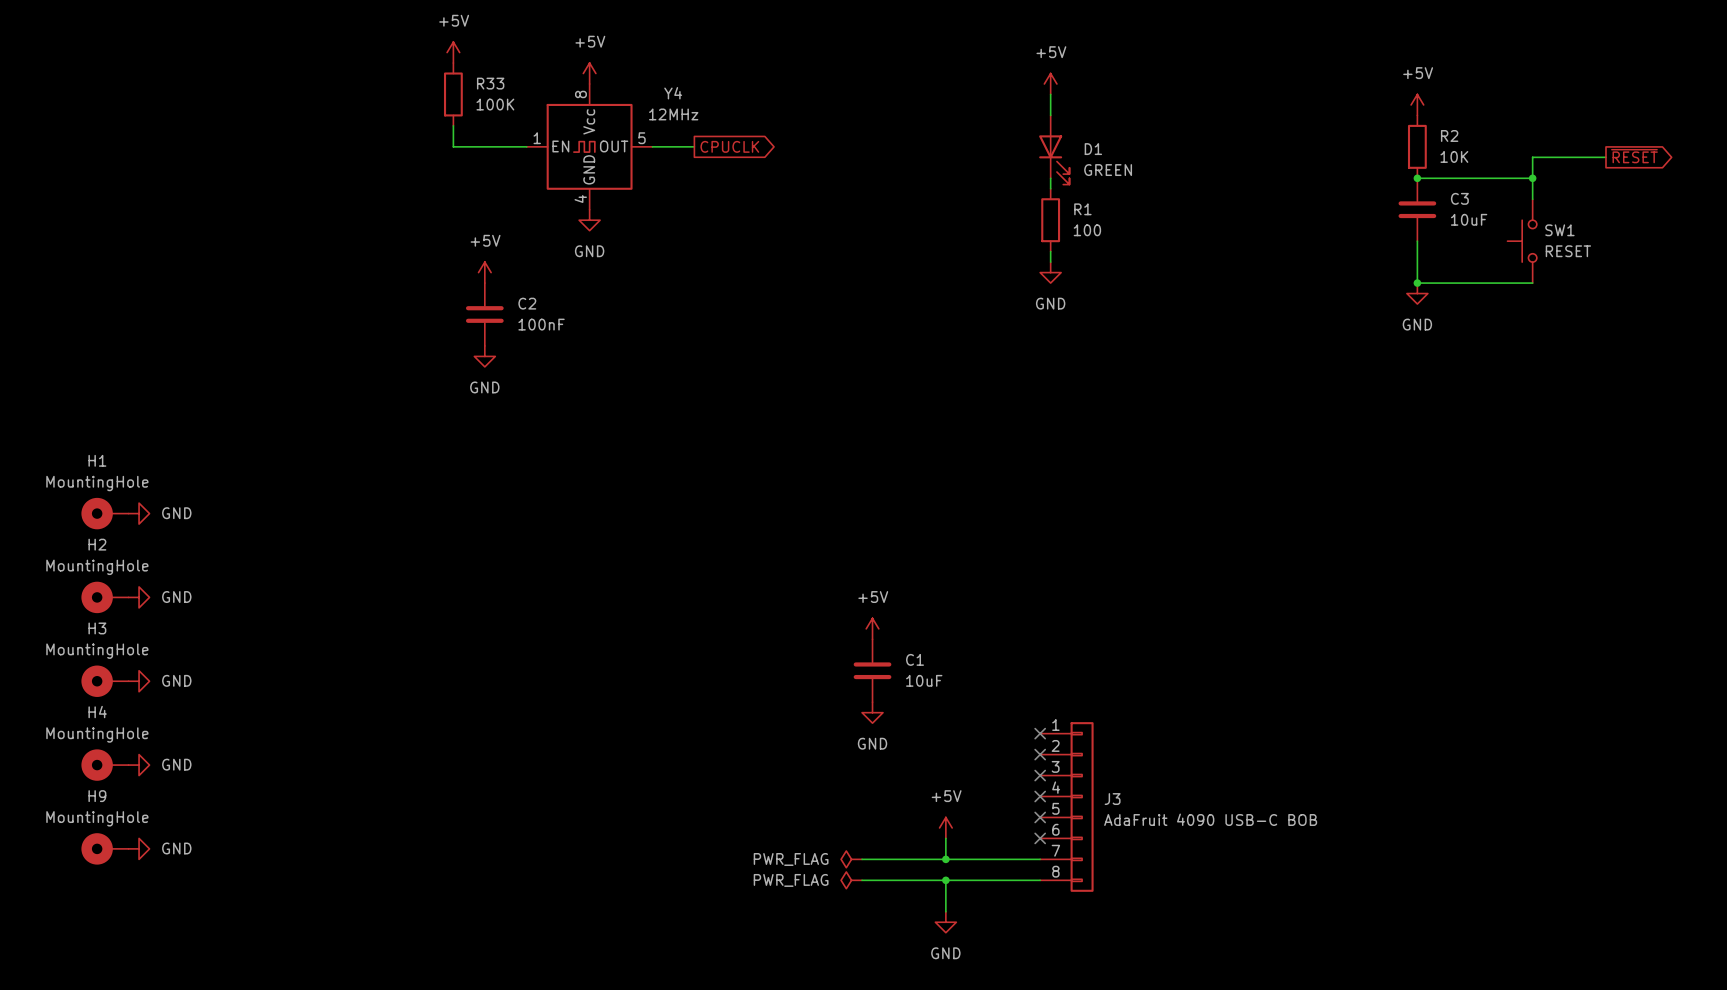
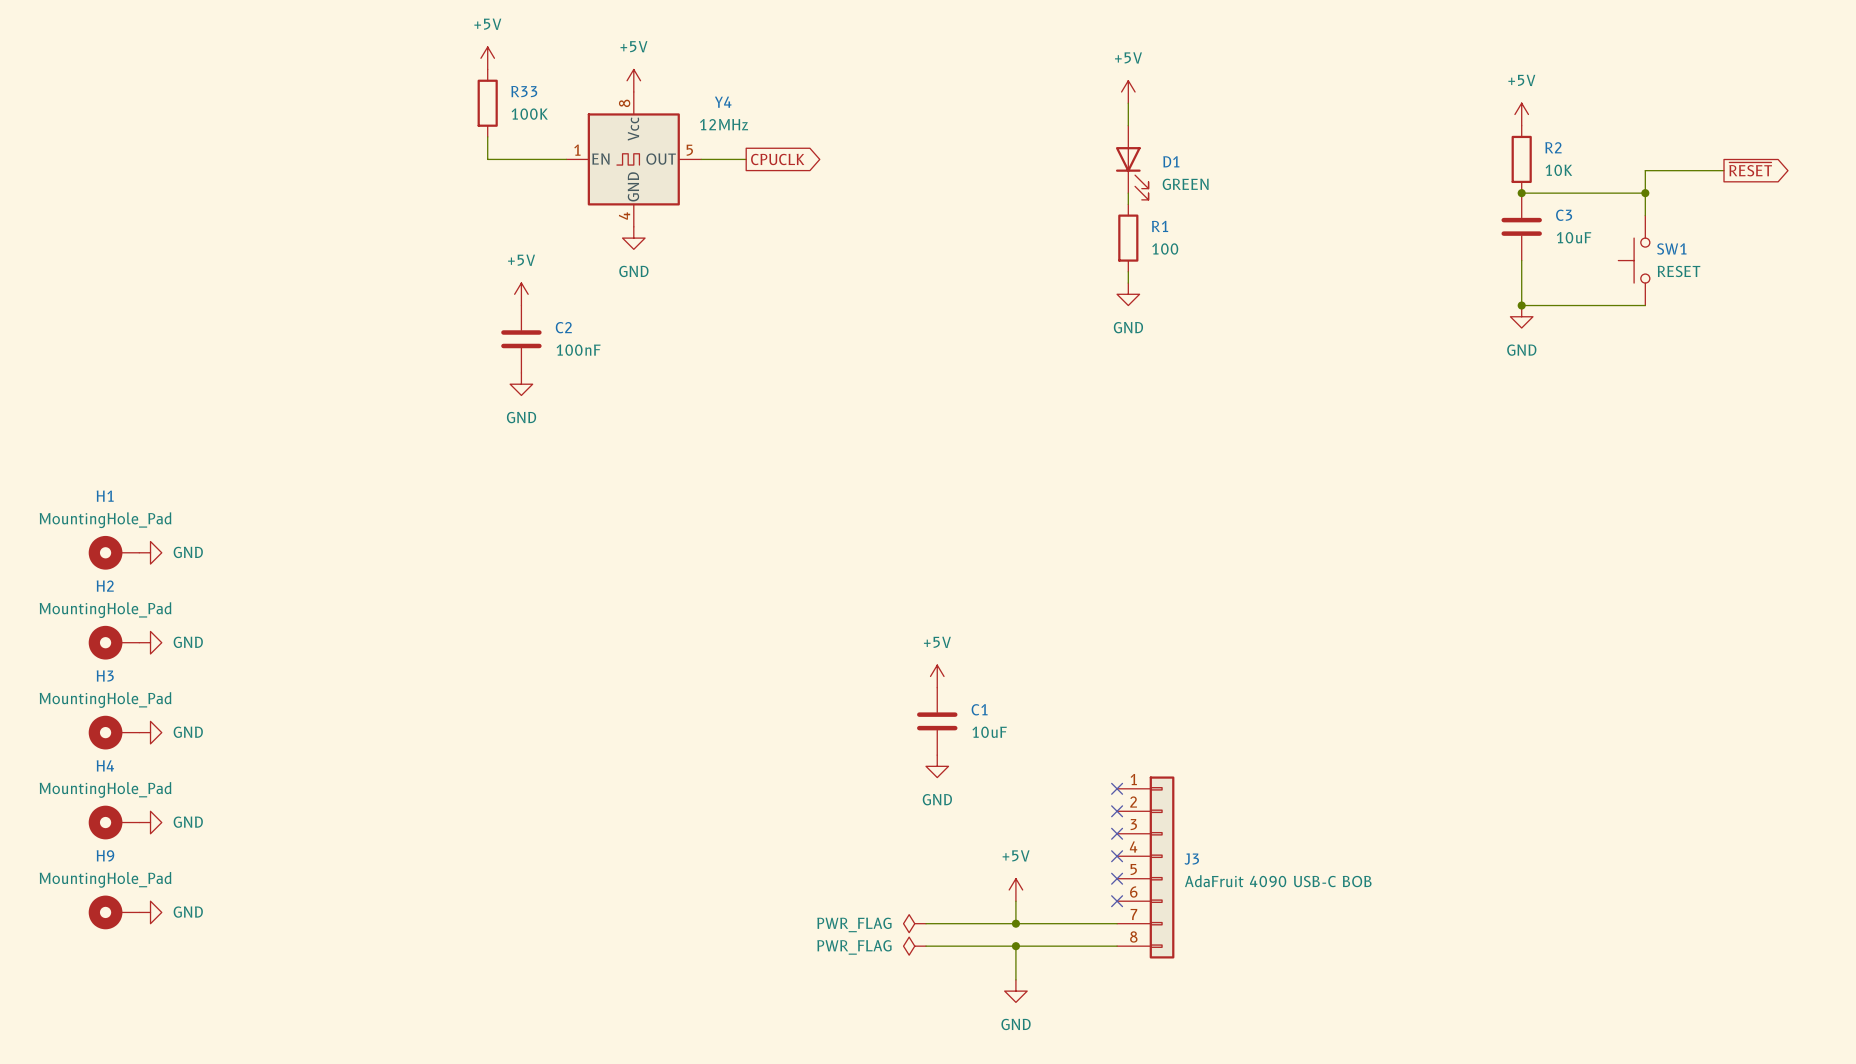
H1 value: MountingHole (97, 483) -> MountingHole_Pad (105, 520)
H2 value: MountingHole (97, 567) -> MountingHole_Pad (105, 610)
H3 value: MountingHole (97, 651) -> MountingHole_Pad (105, 700)
H4 value: MountingHole (97, 734) -> MountingHole_Pad (105, 789)
H9 value: MountingHole (97, 818) -> MountingHole_Pad (105, 879)

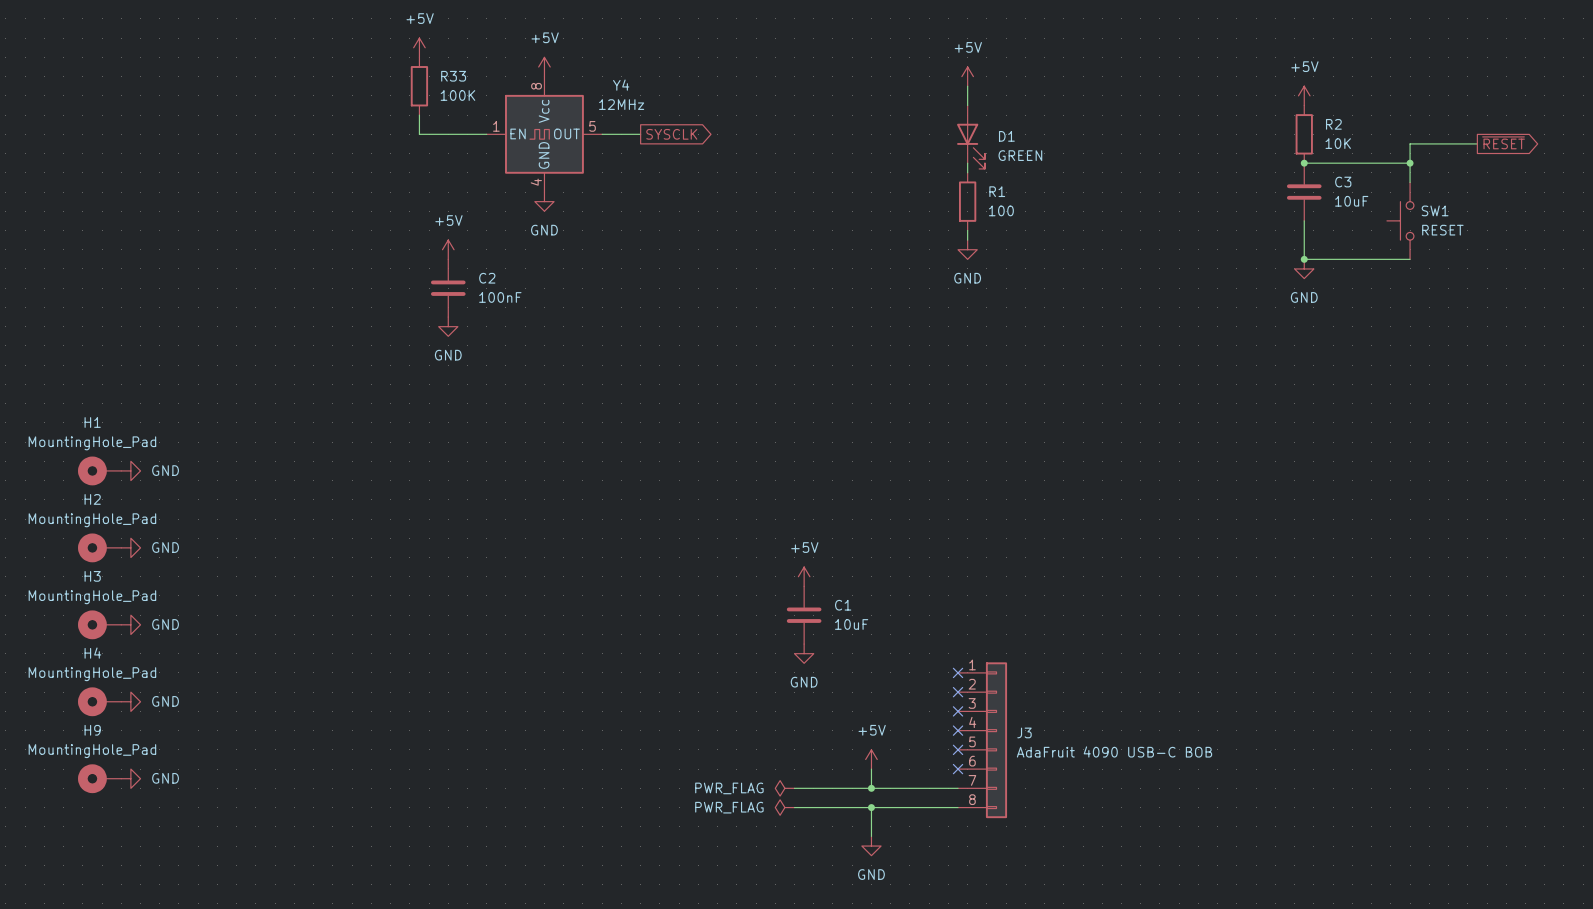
global label: CPUCLK (777, 159) -> SYSCLK (671, 134)

